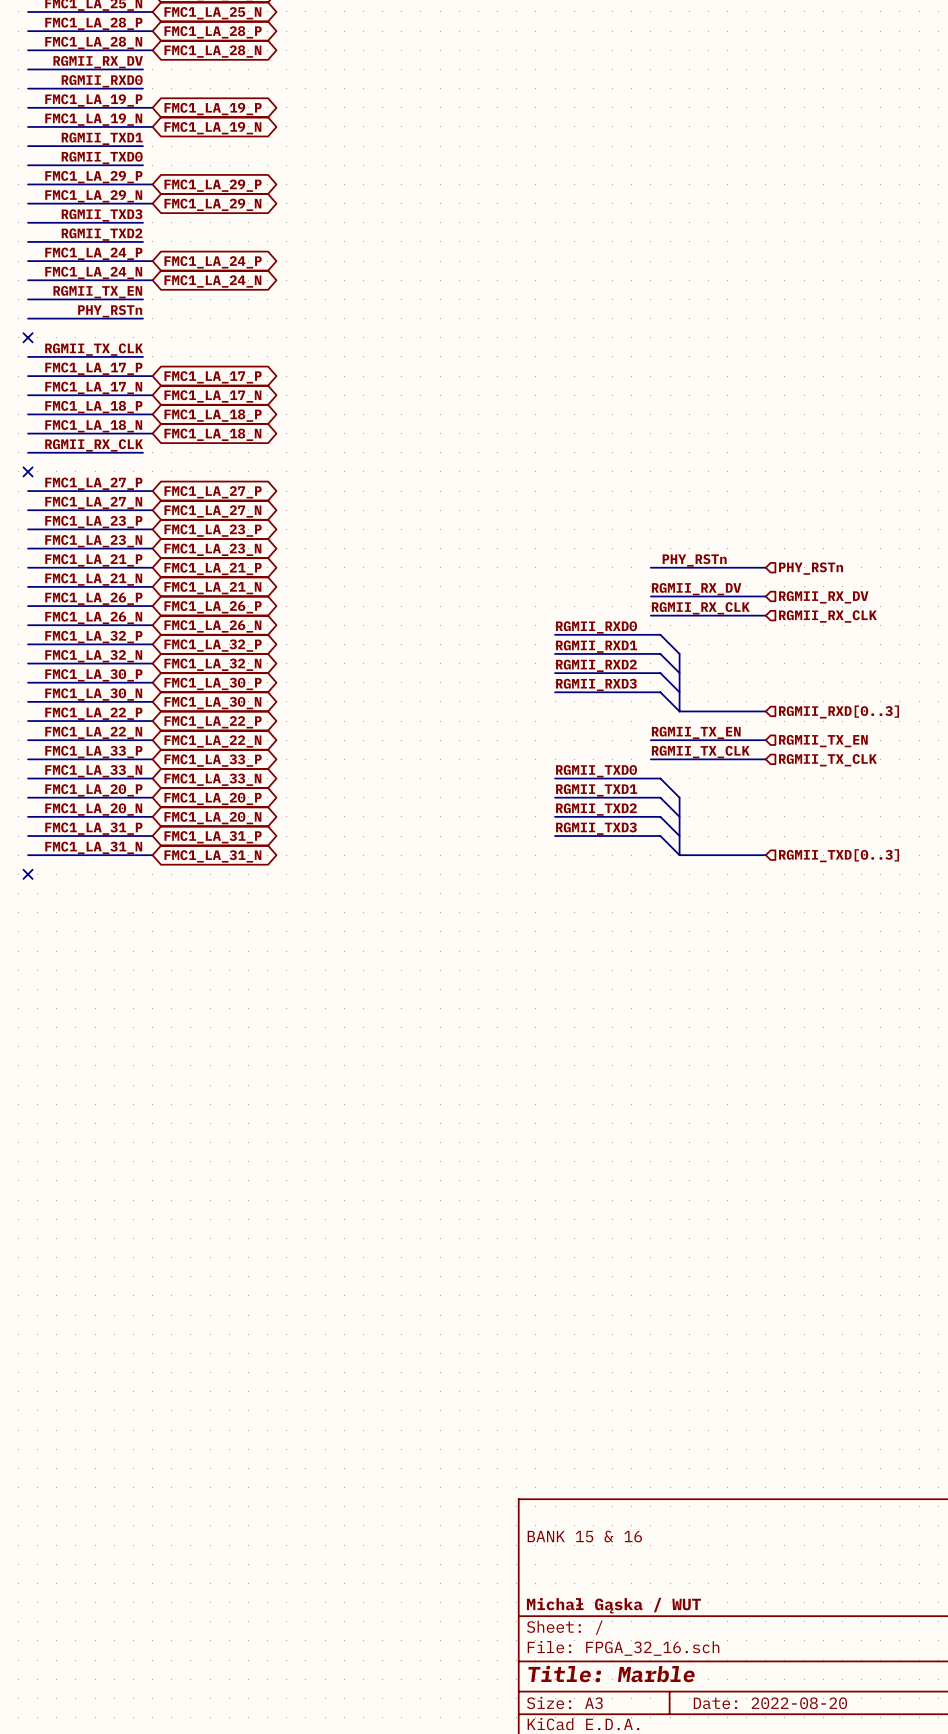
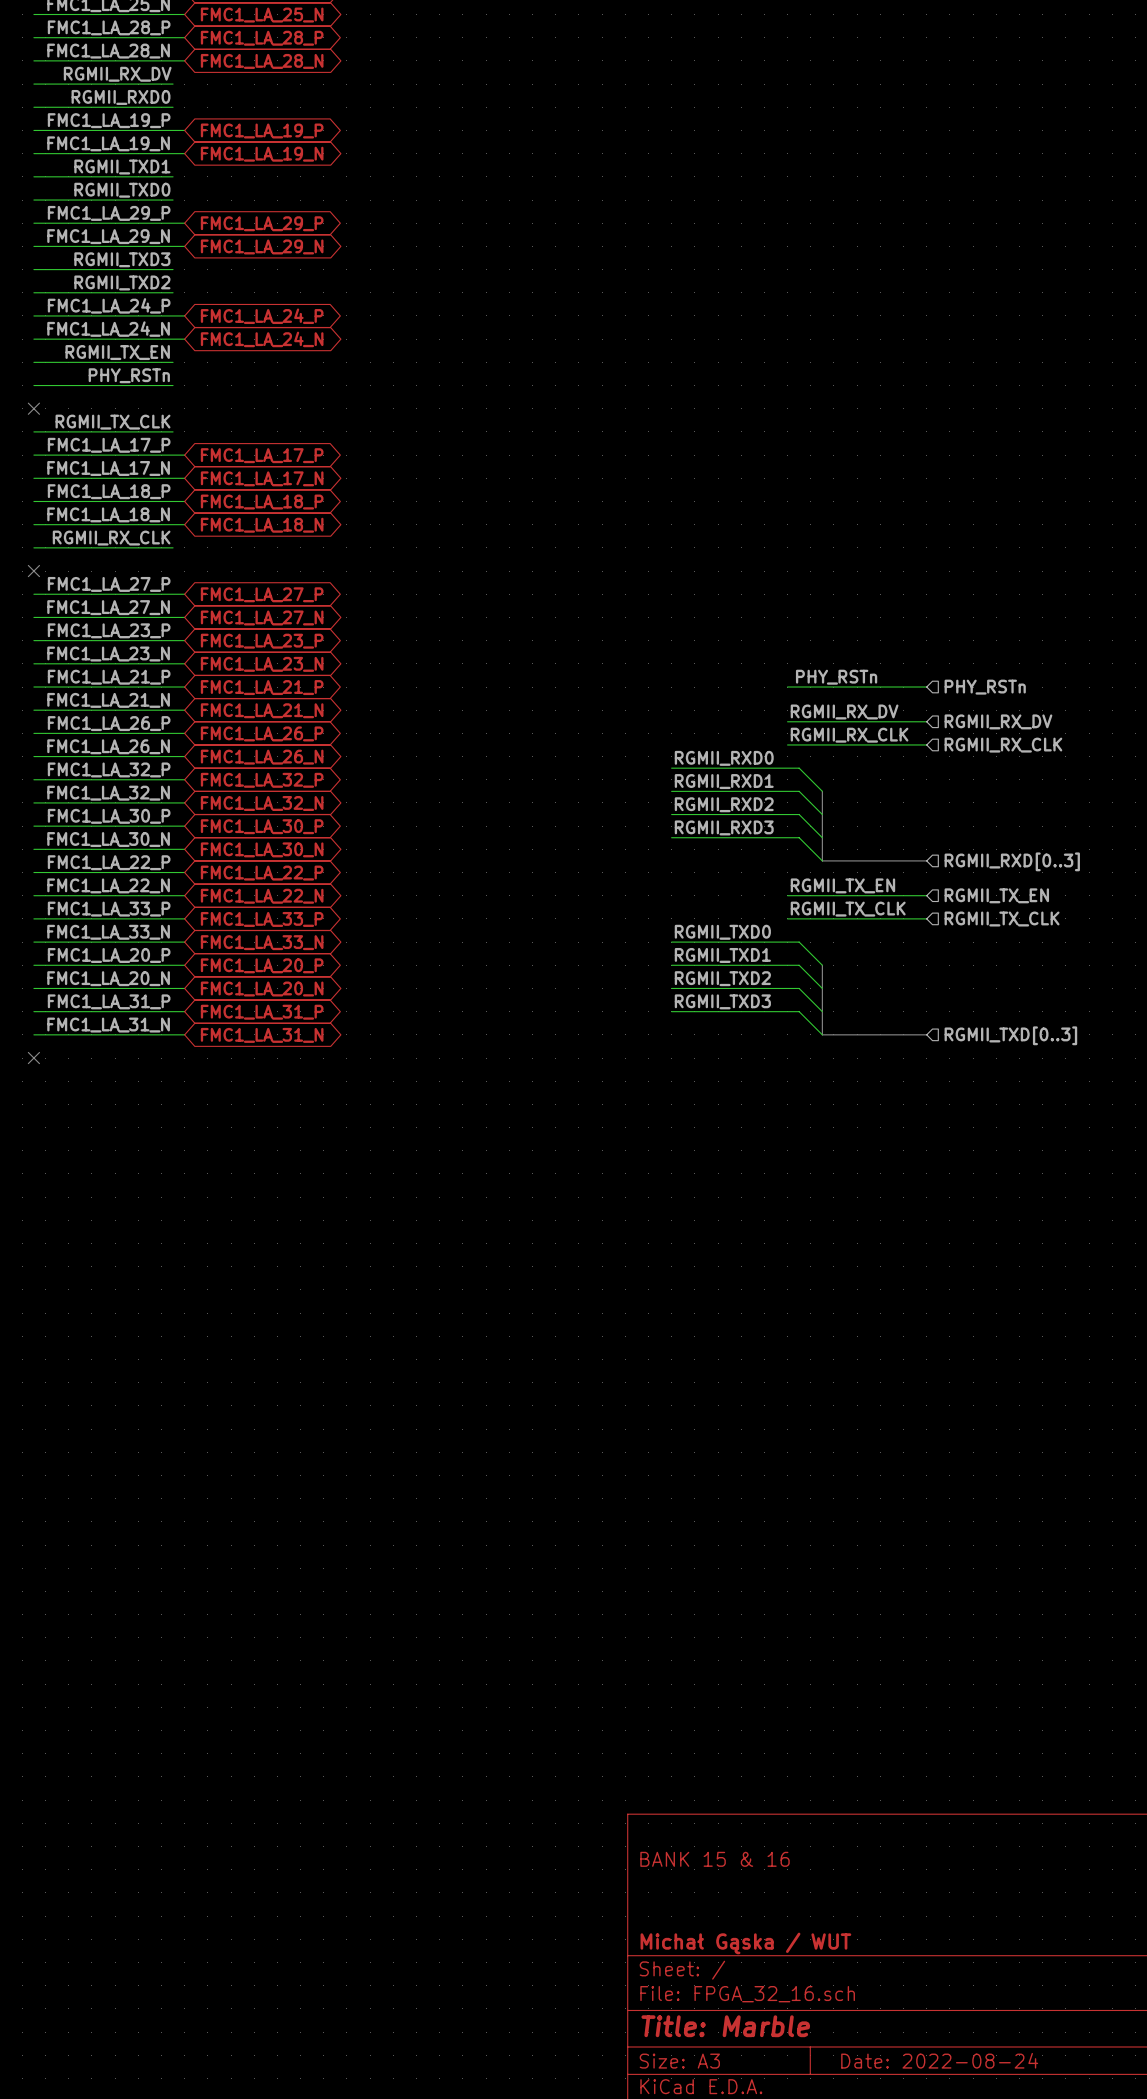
title block: Date: 2022-08-20 (770, 1703) -> Date: 2022-08-24 (939, 2060)

